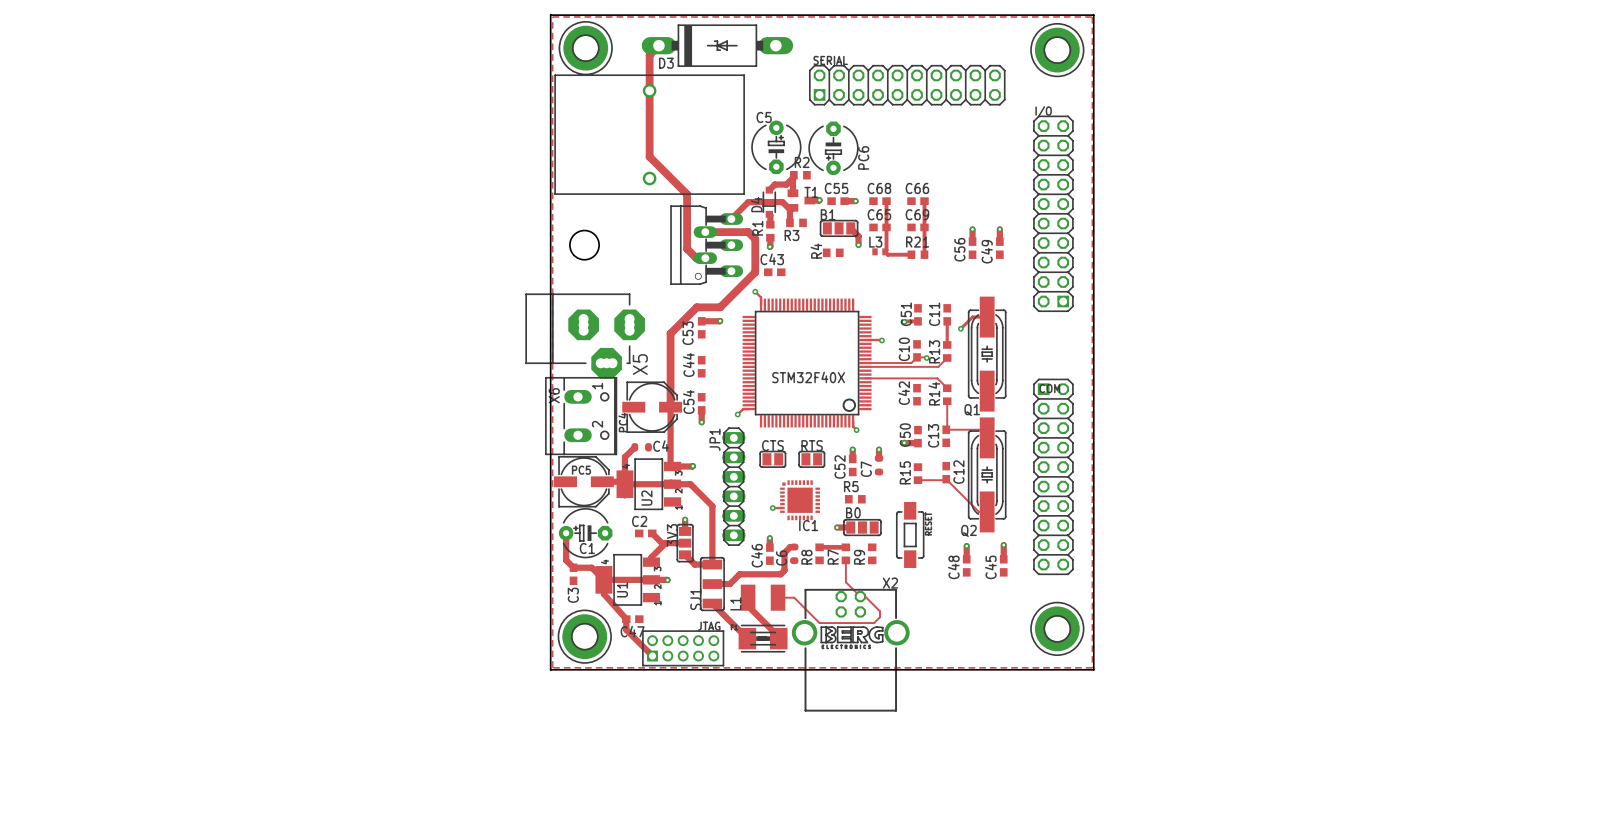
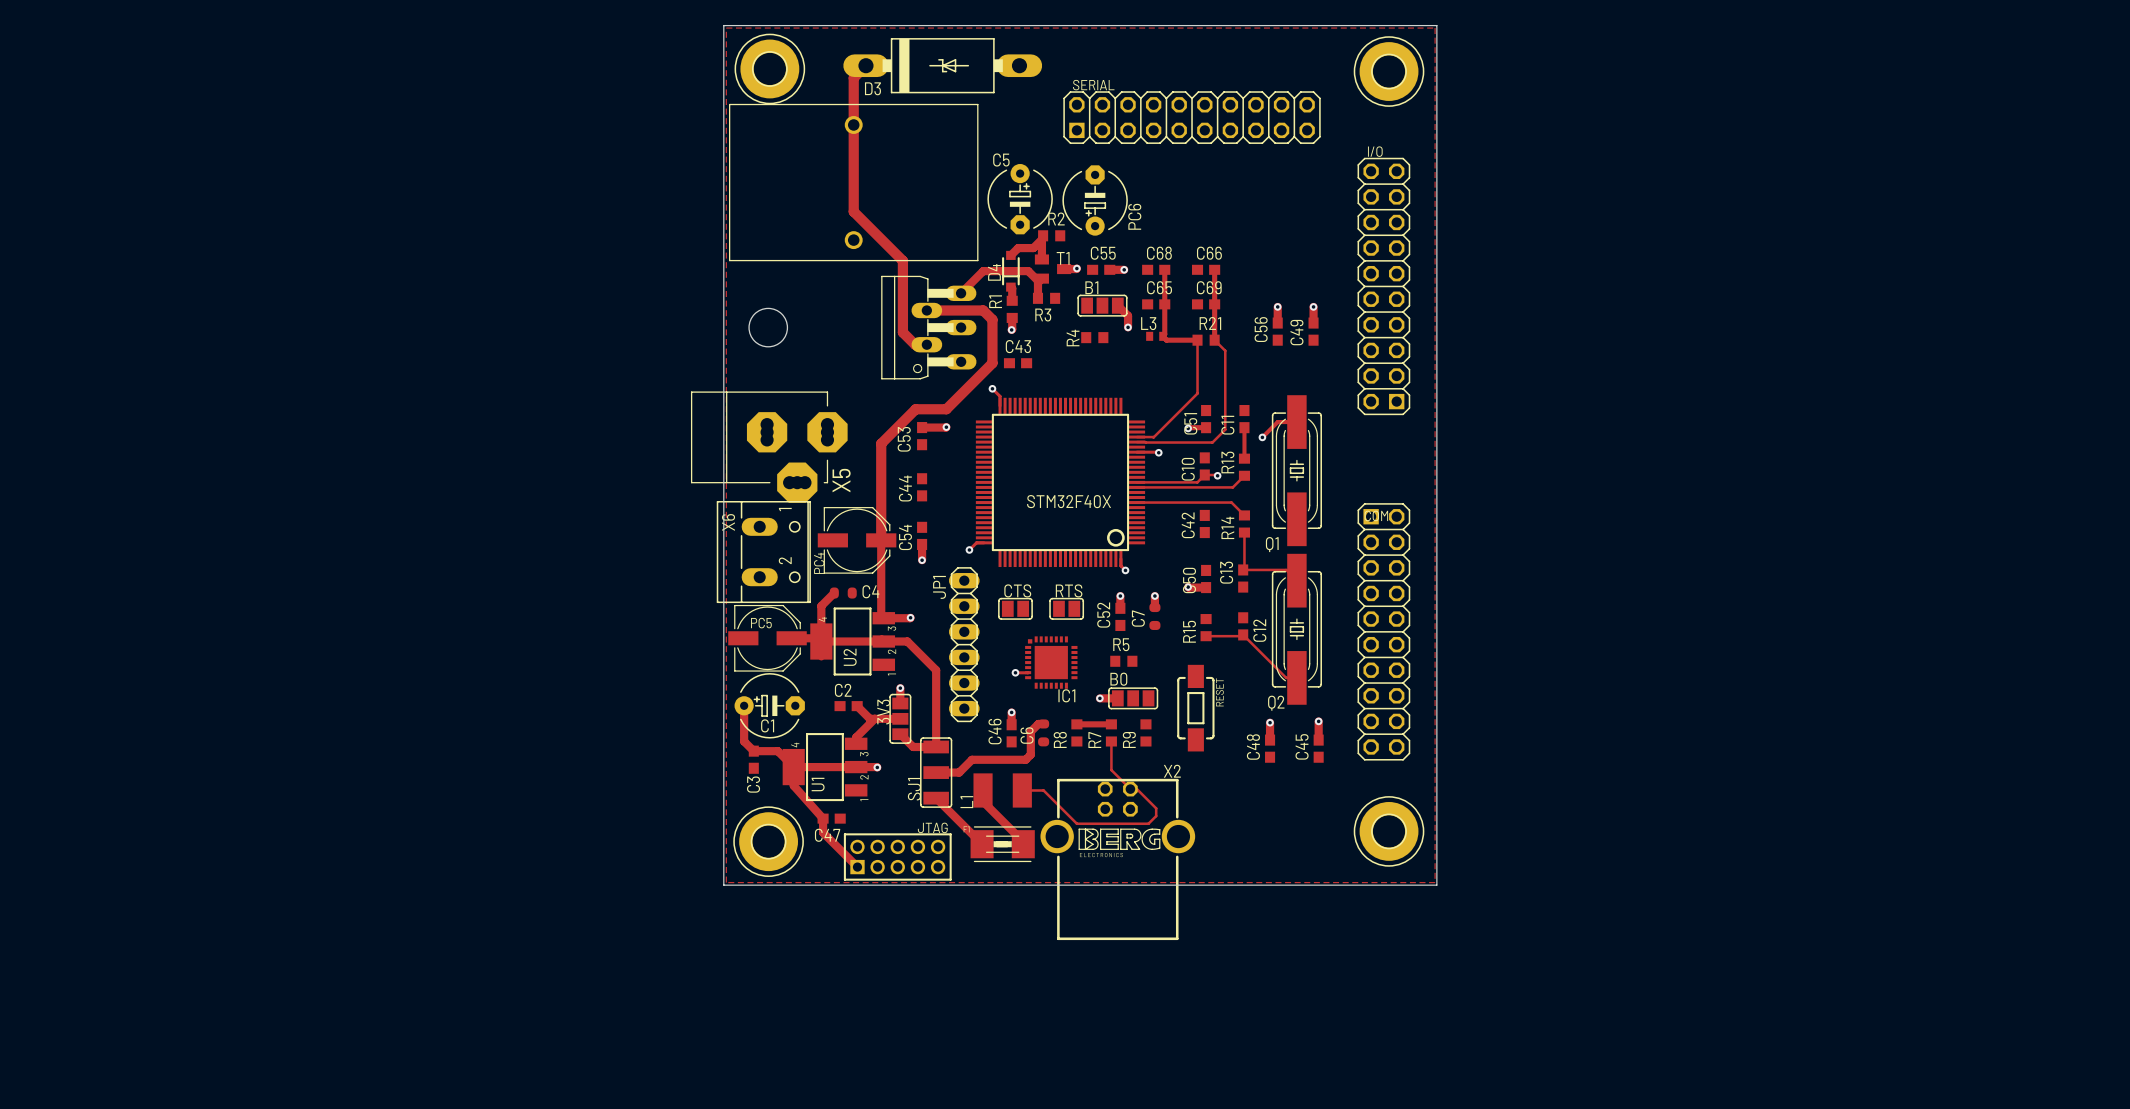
track: none -> (1197, 340) (1197, 393) (1153, 437) (1137, 437)
track: none -> (1214, 340) (1225, 350) (1225, 429) (1212, 442) (1137, 442)

